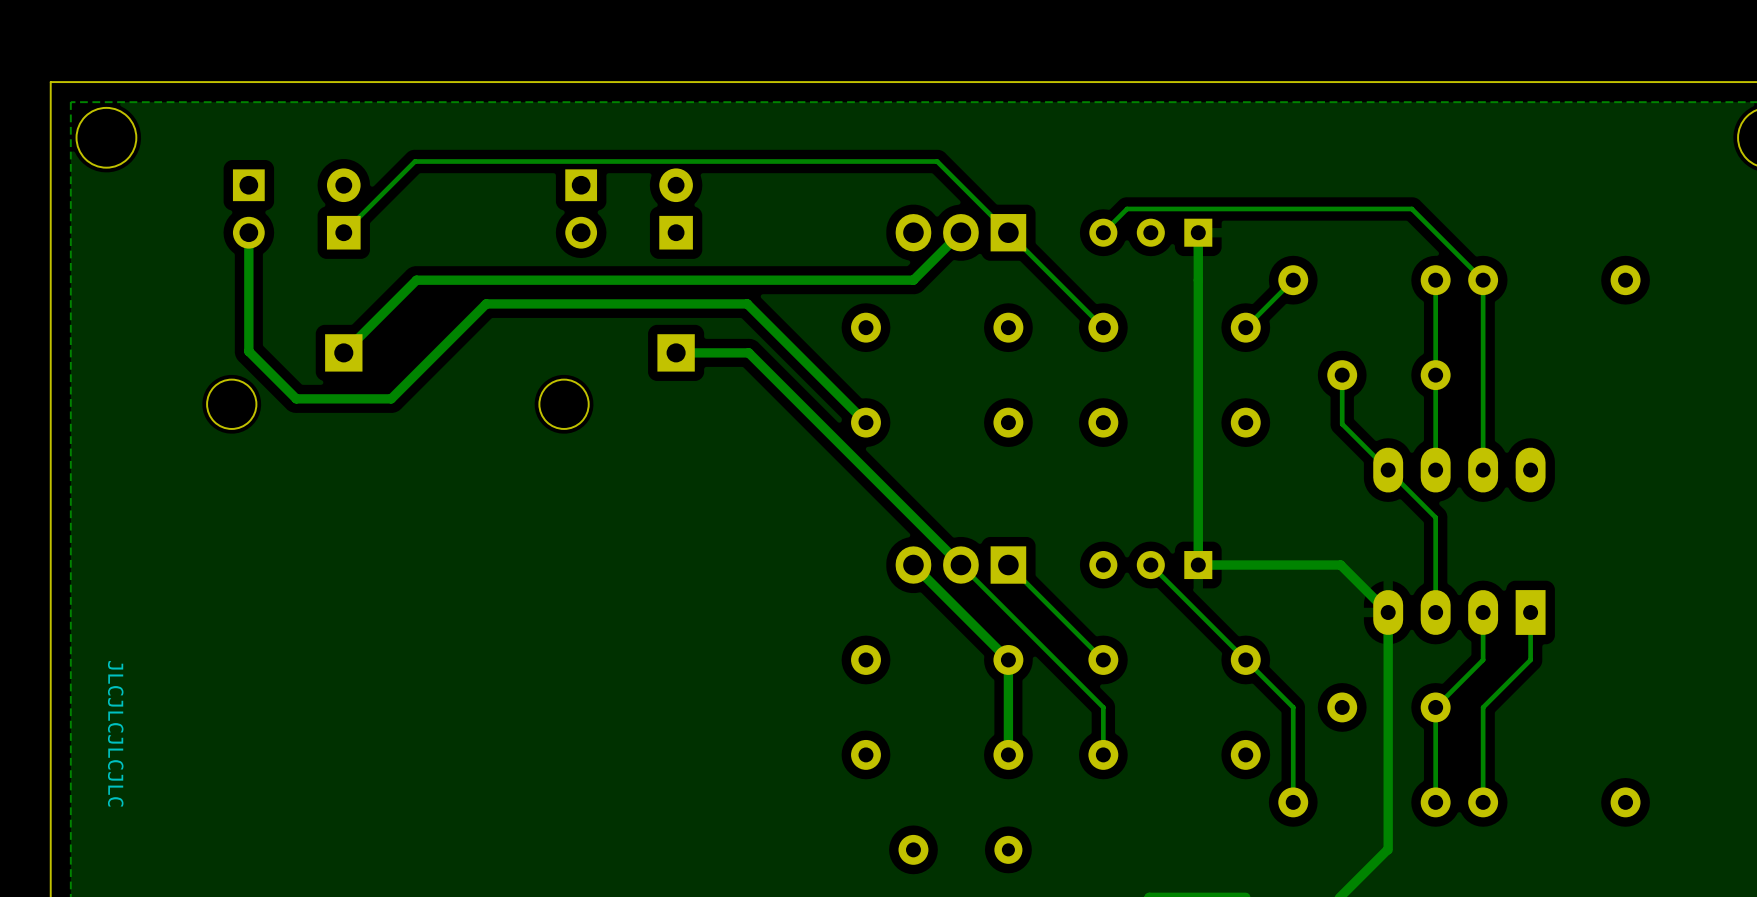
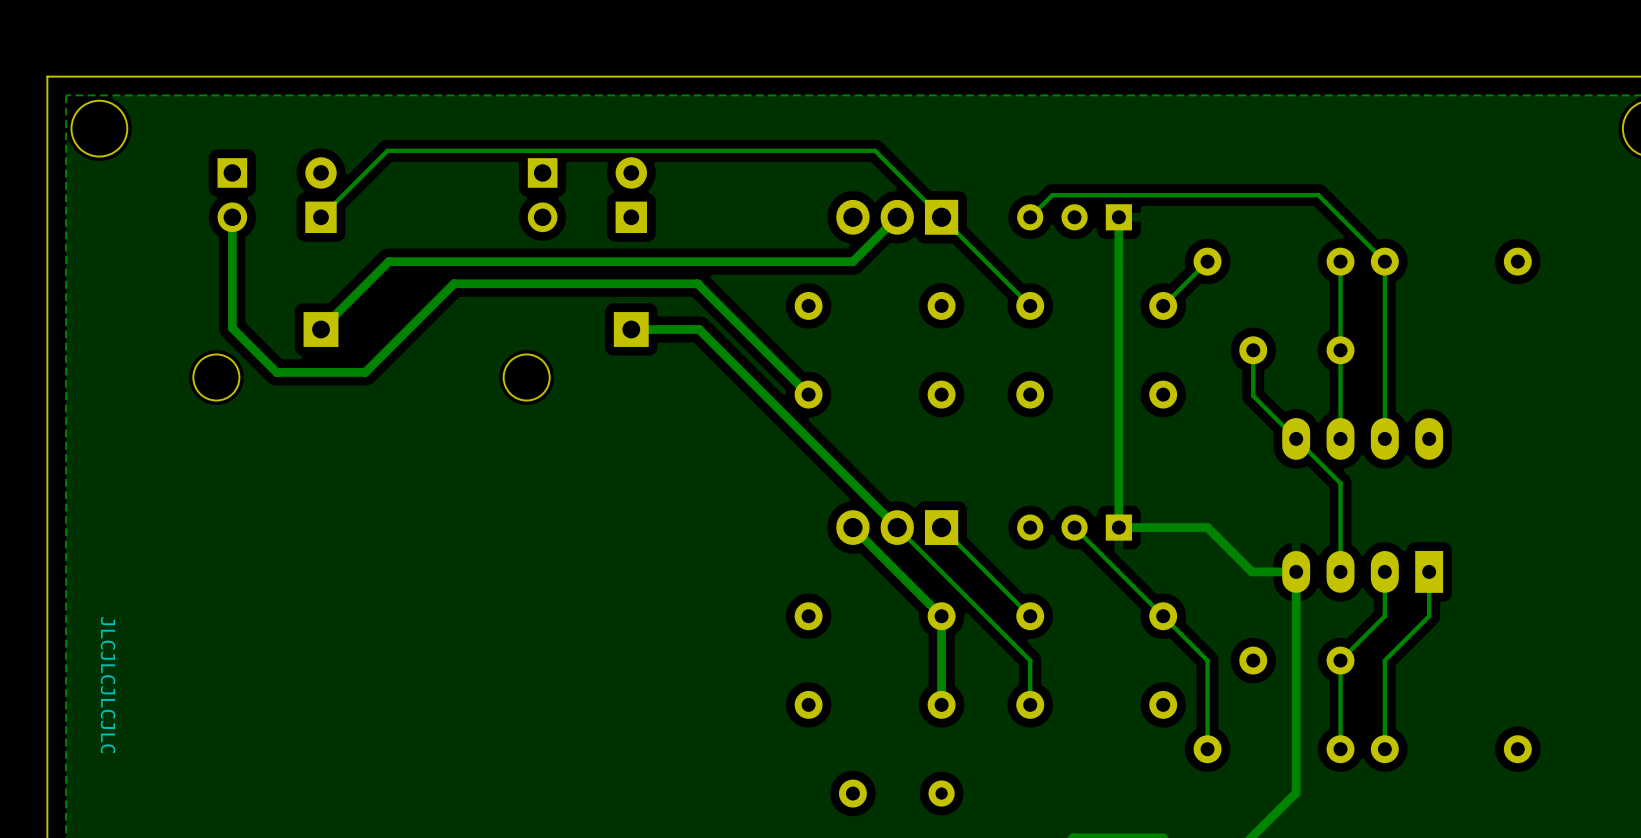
track: (1293, 565) (1340, 565) (1388, 612) -> (1207, 527) (1251, 571) (1296, 571)

